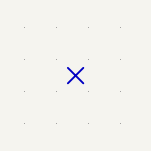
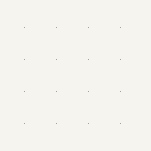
no-connect mark: (75, 75) -> none

